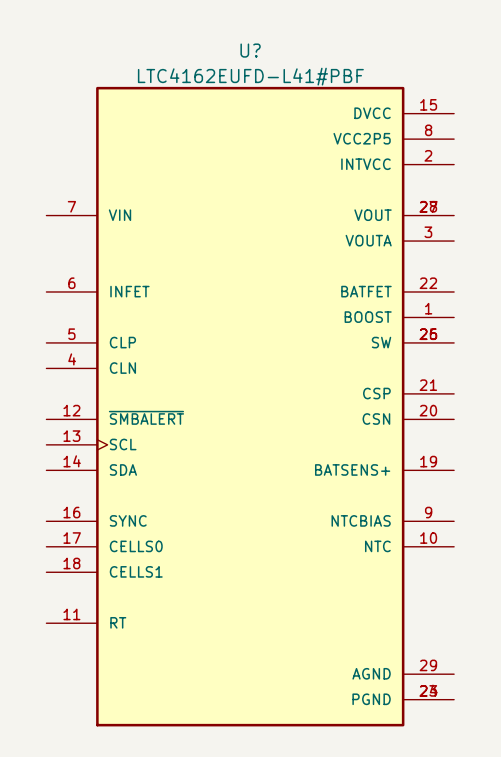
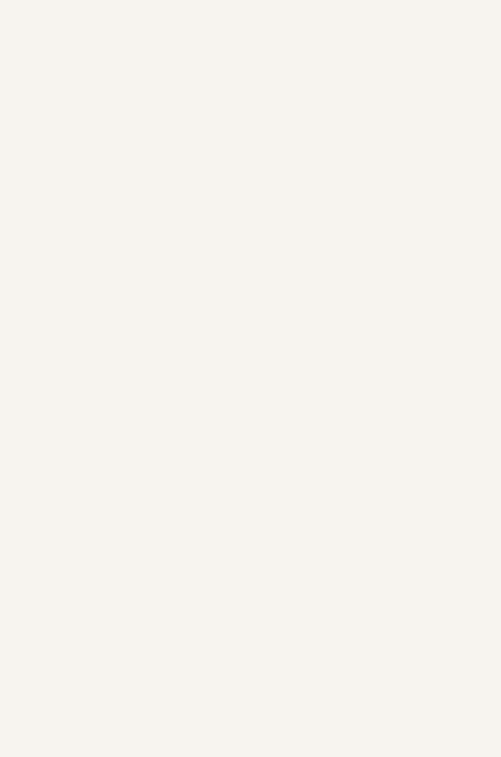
U?: LTC4162EUFD-L41#PBF (250, 406) -> none

